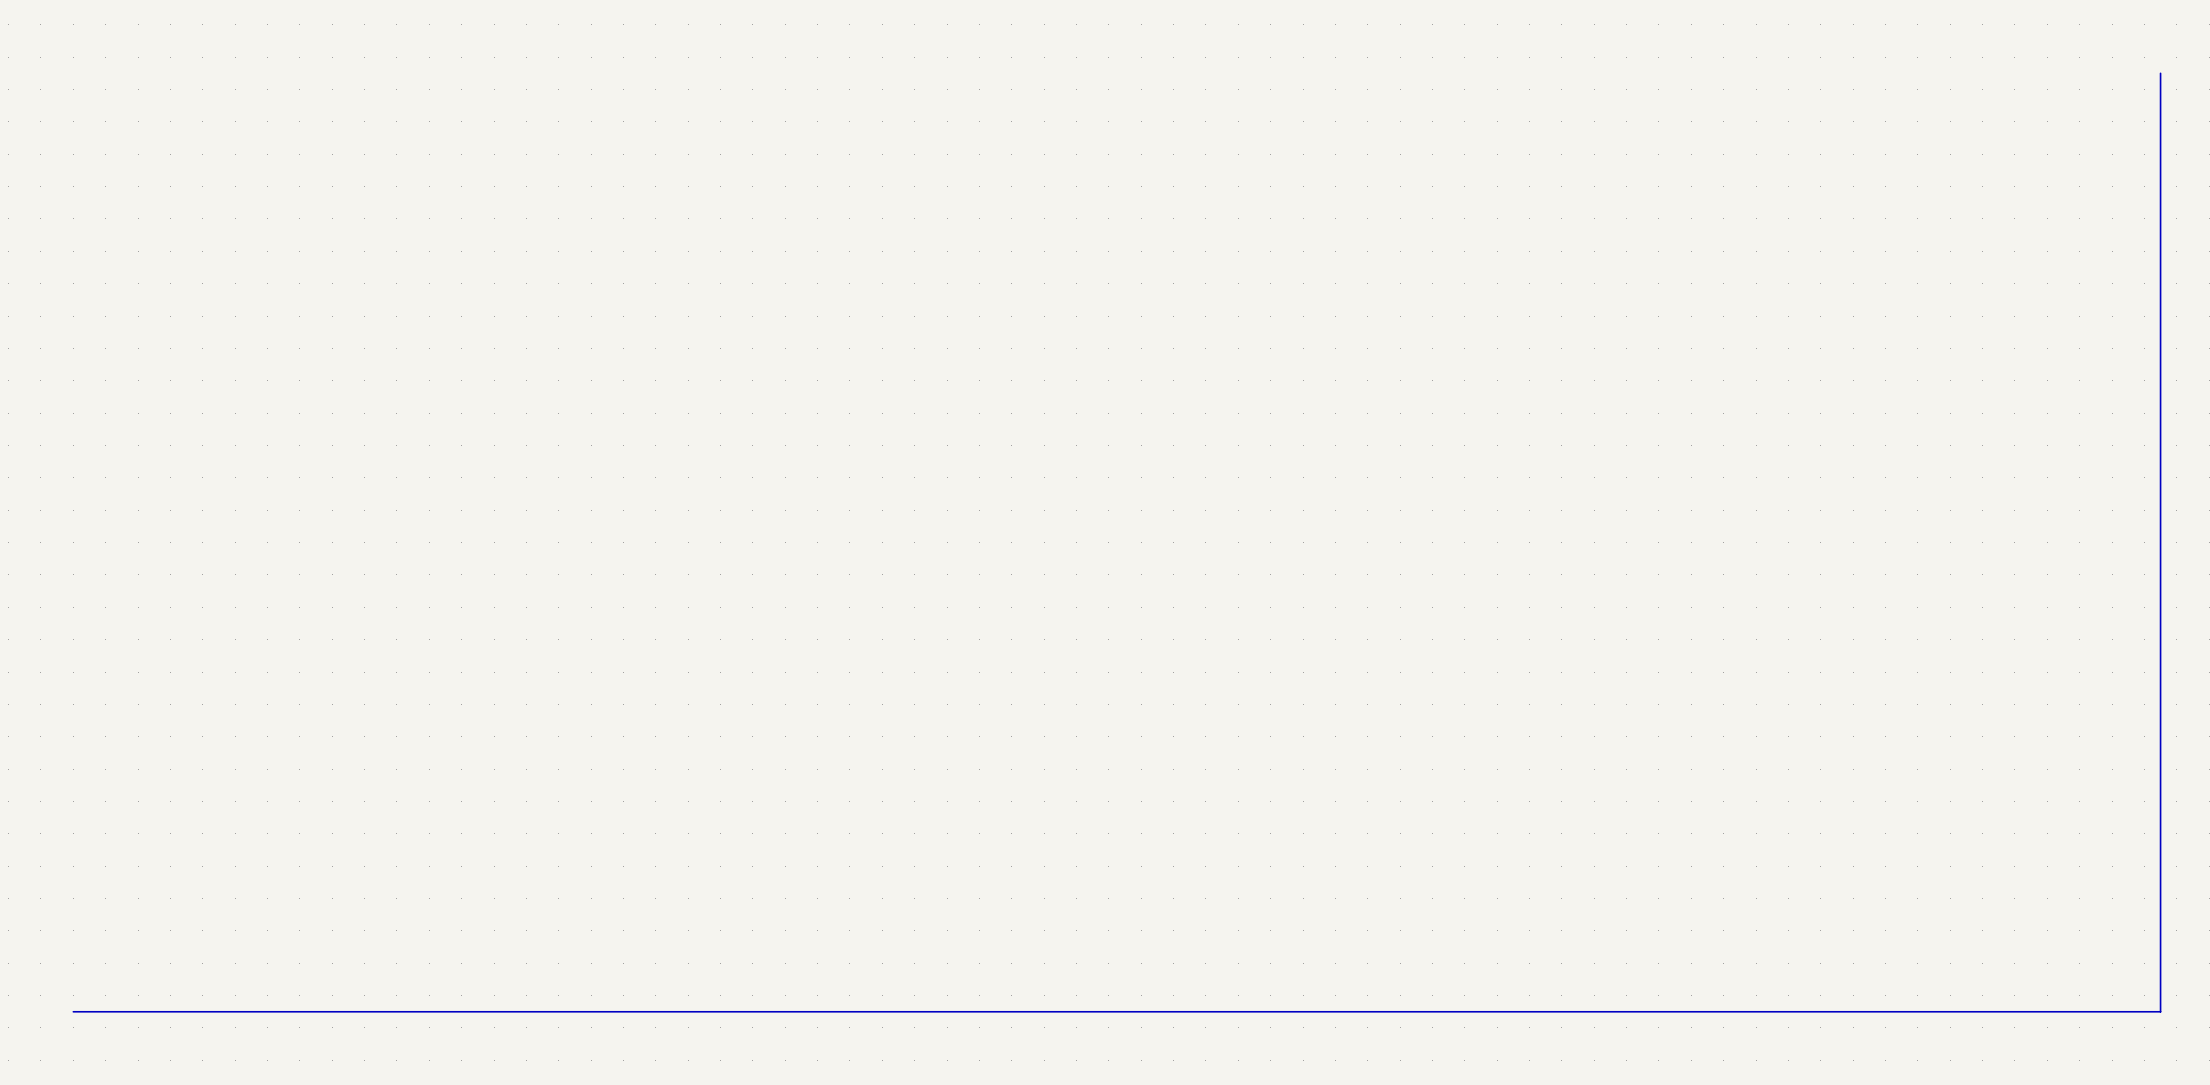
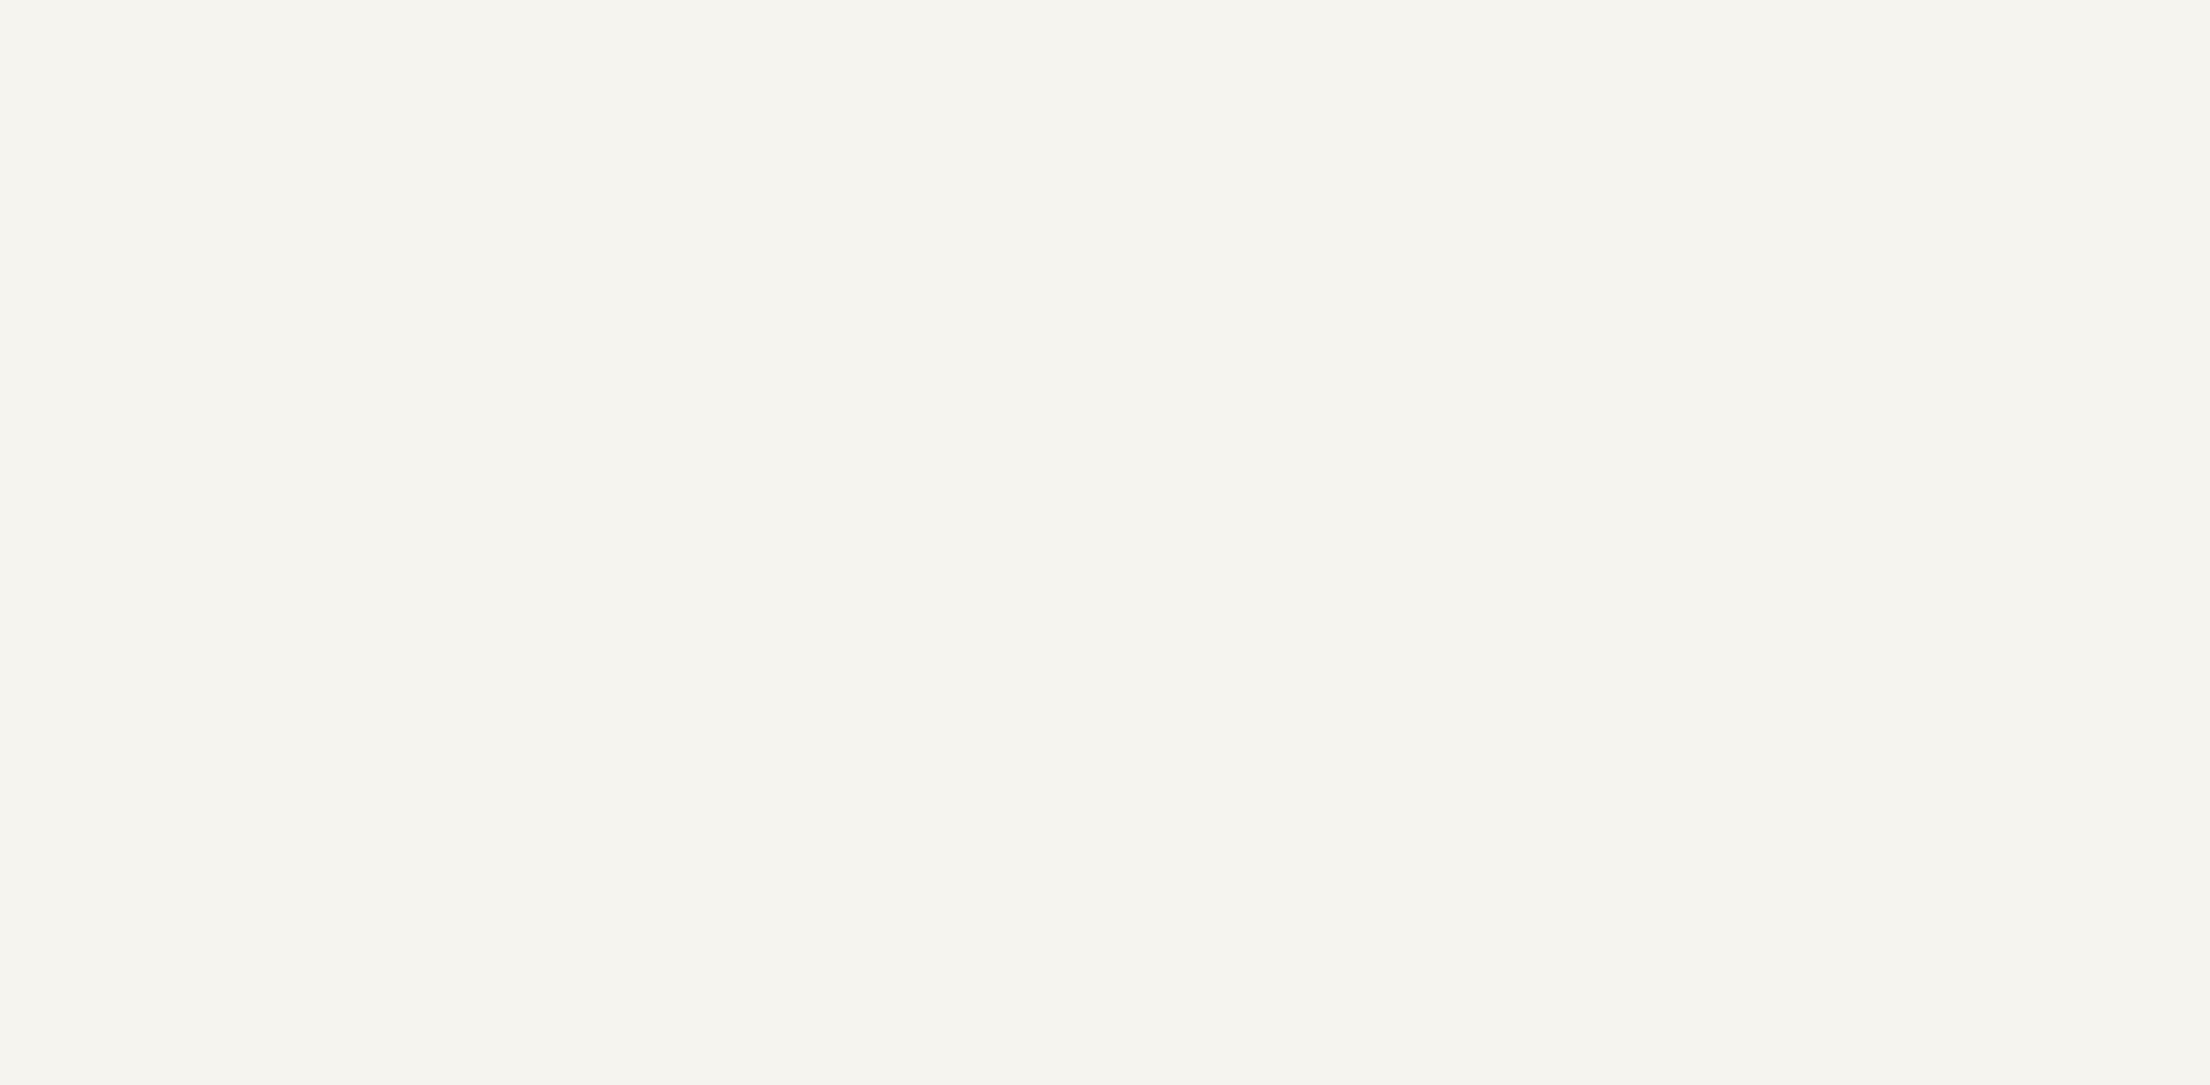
line: (2160, 73) (2160, 1011) (73, 1011) -> none

